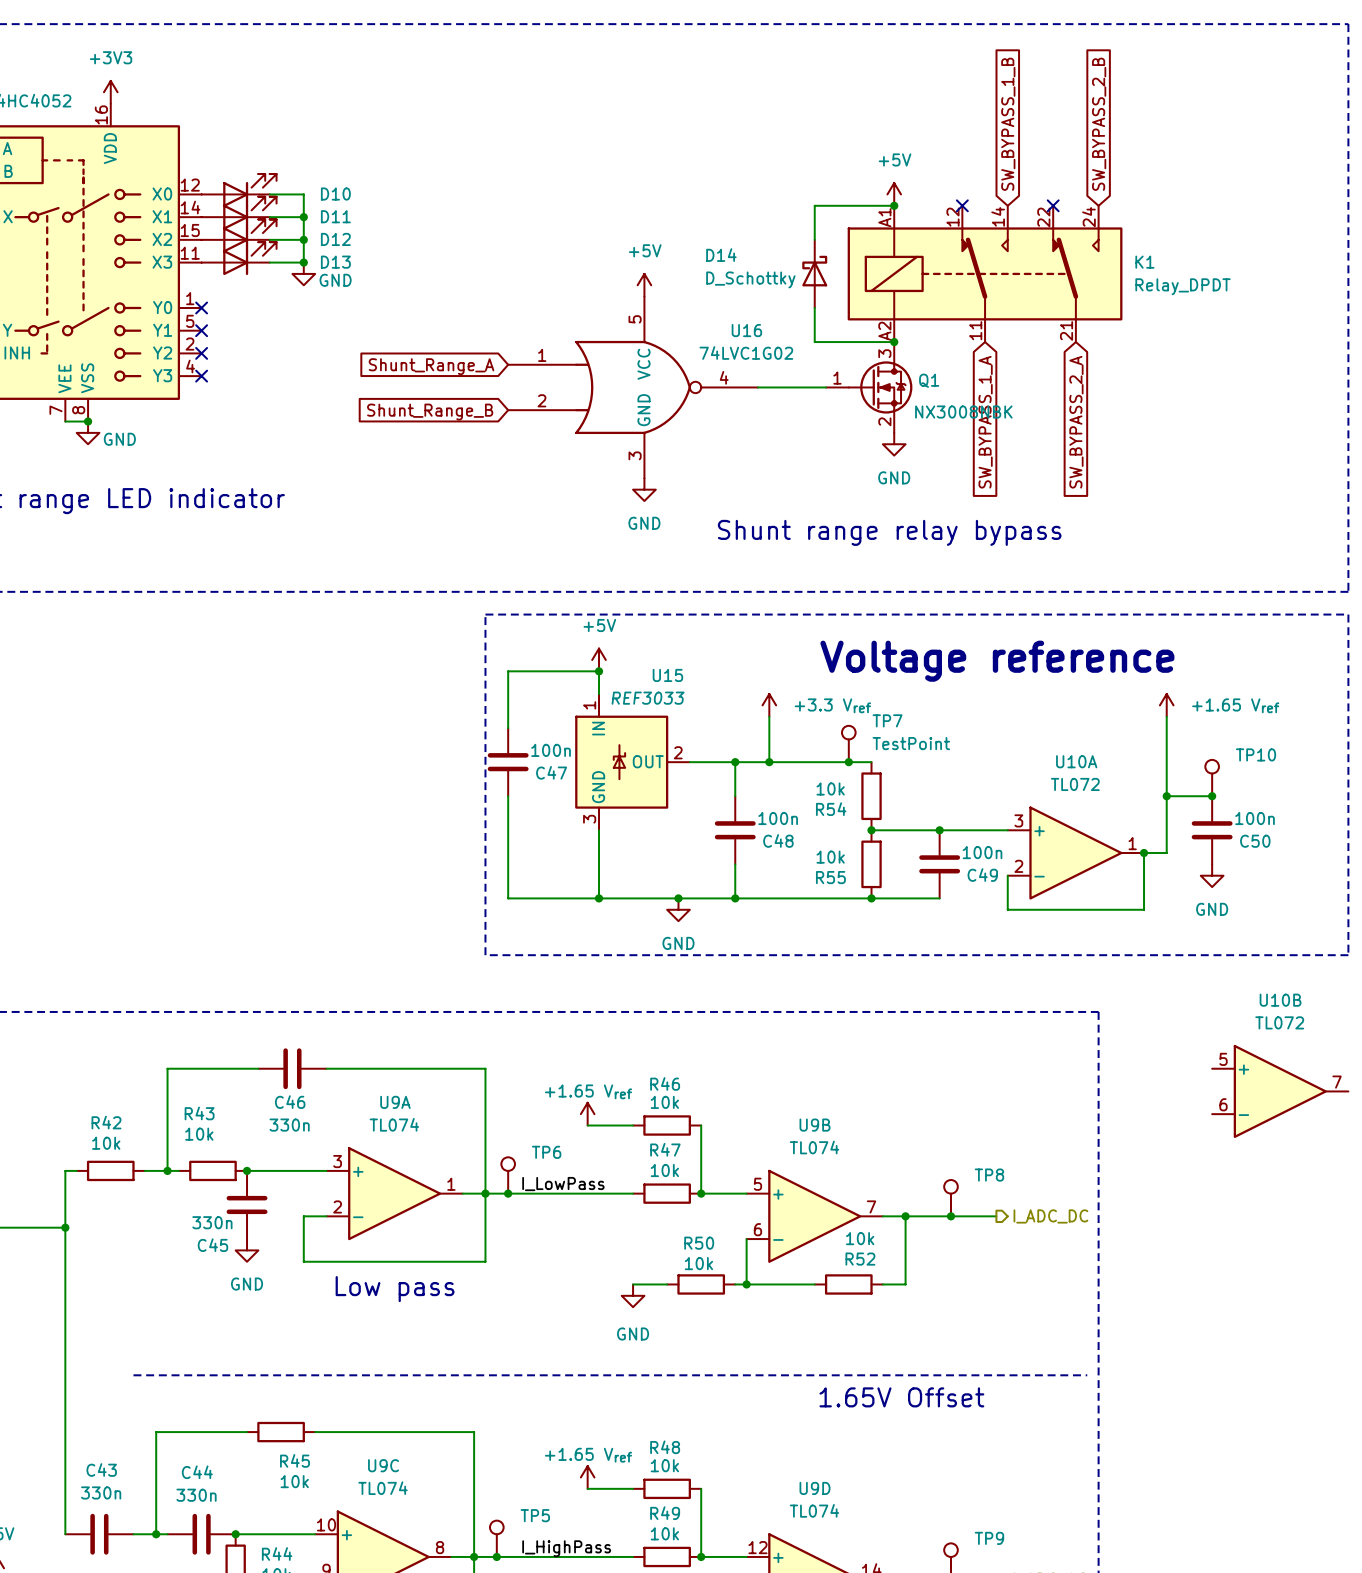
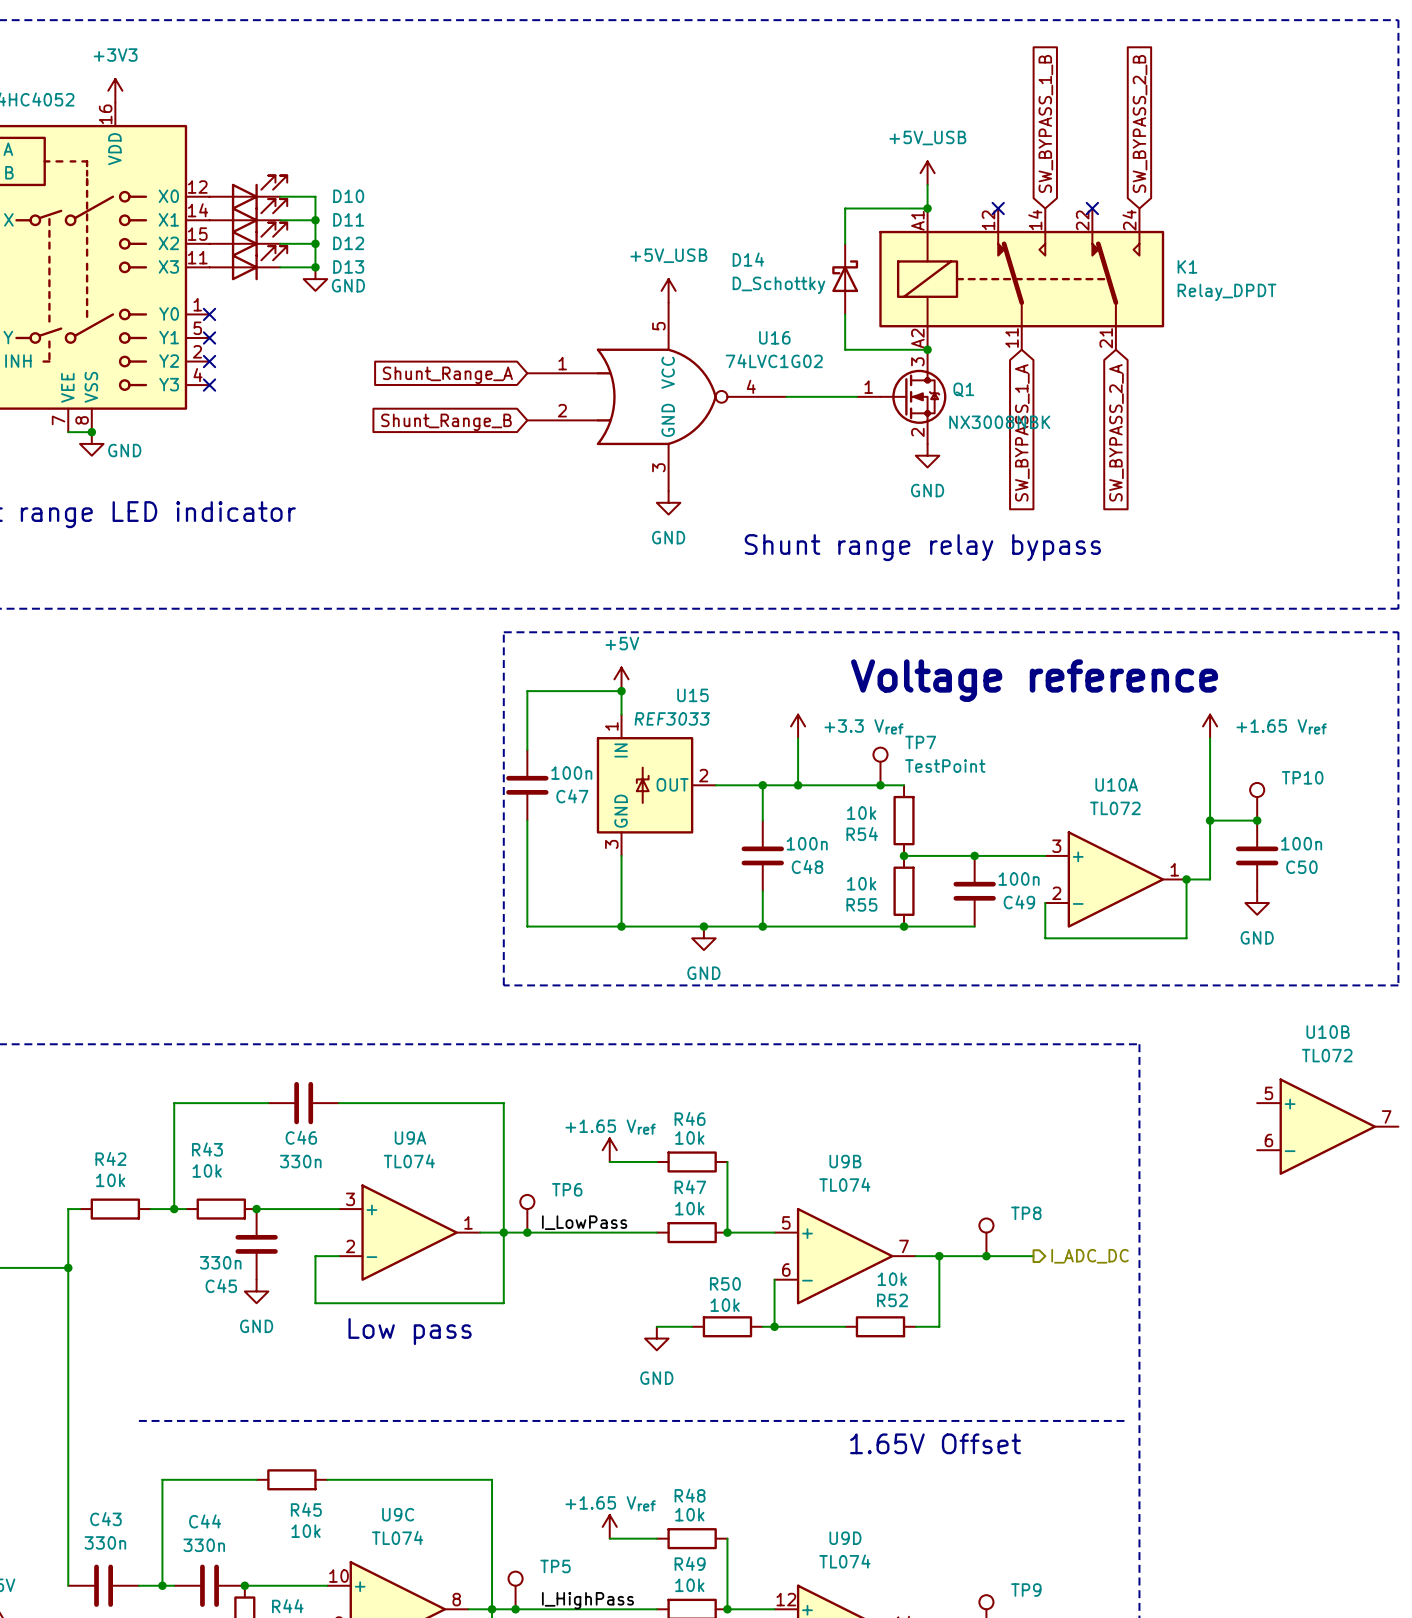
power symbol: none -> +5V_USB (927, 173)
power symbol: +5V (894, 194) -> none
power symbol: +5V (644, 285) -> +5V_USB (668, 290)

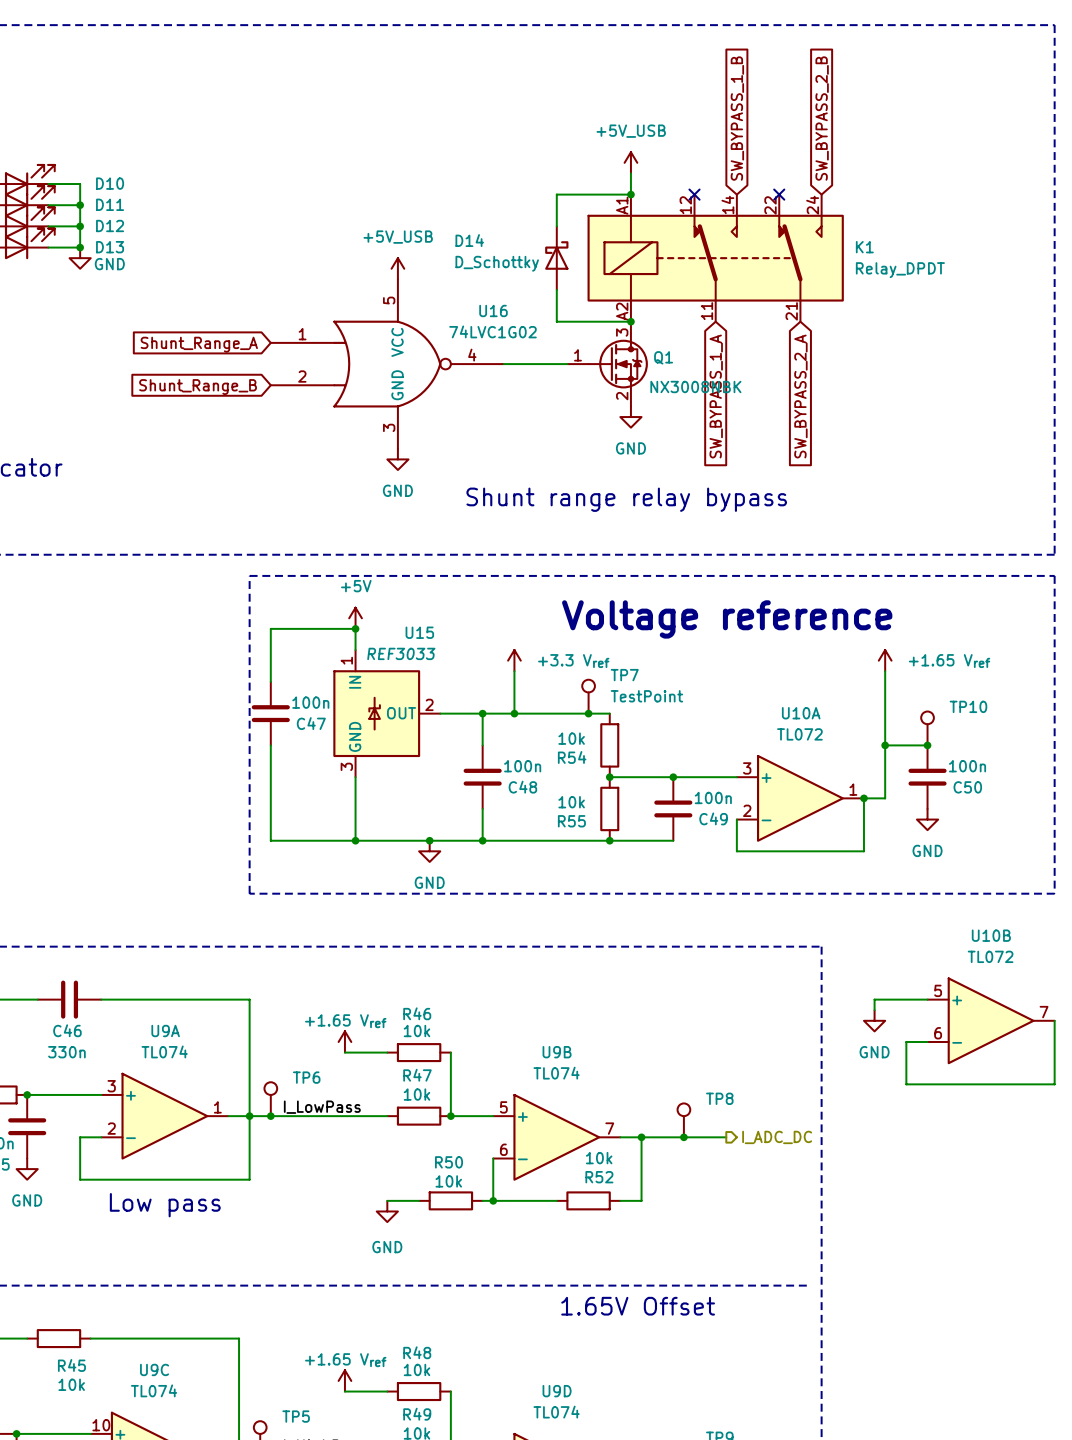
wire: none -> (927, 999) (874, 999) (874, 1010)
power symbol: none -> GND (874, 1020)
wire: none -> (1054, 1020) (1054, 1084) (906, 1084) (906, 1041) (927, 1041)

